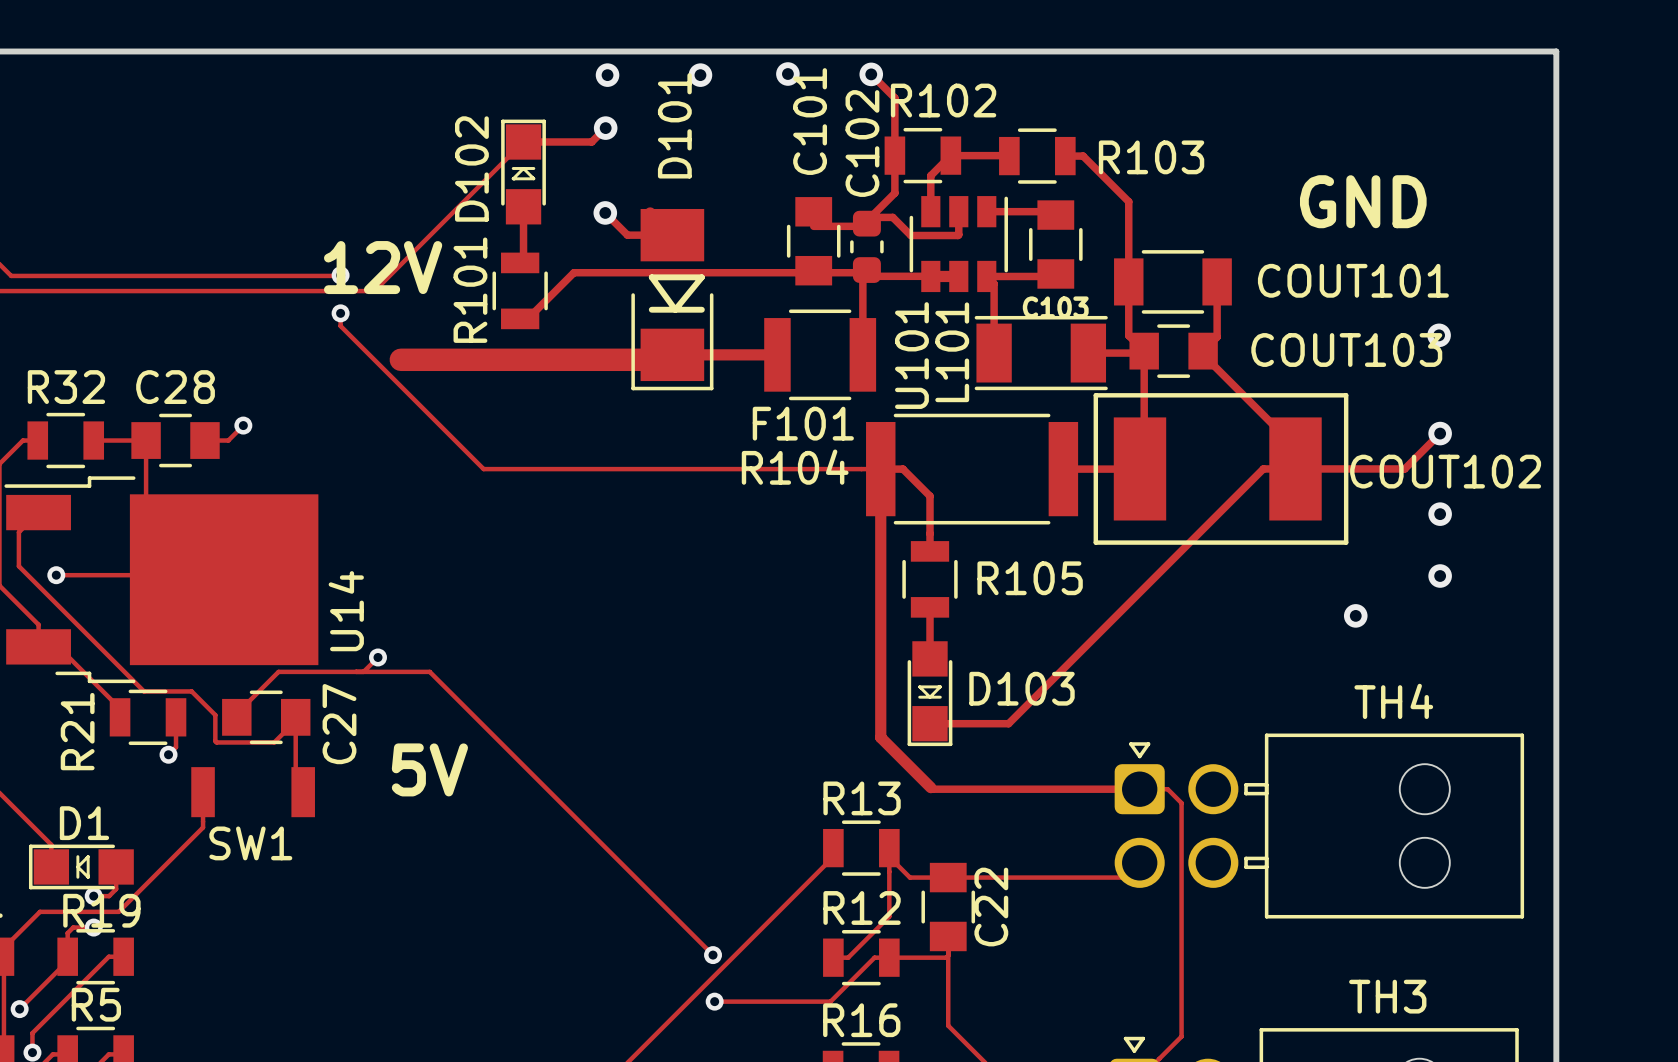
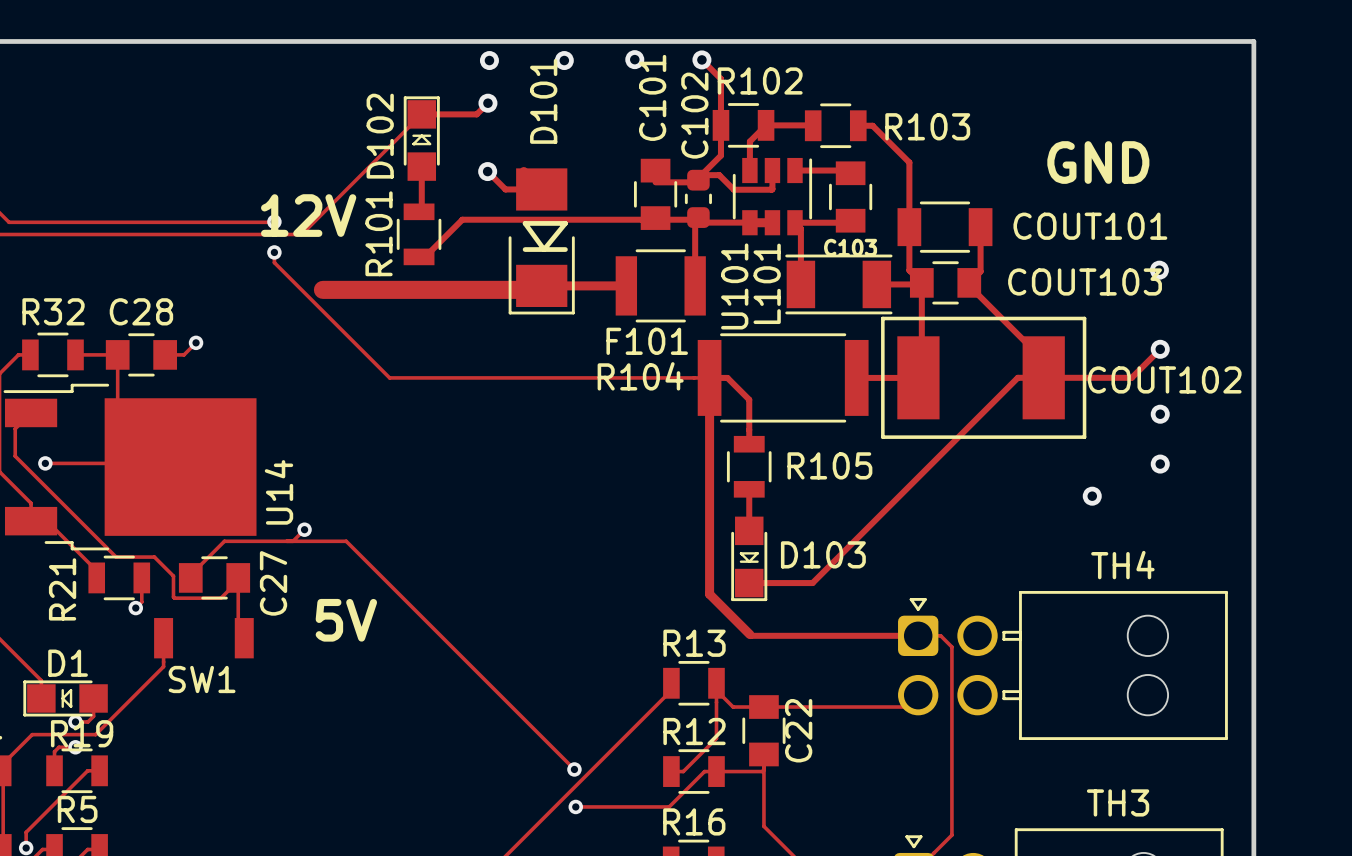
track: (67, 956) (67, 961) (19, 1009) -> none
via: (19, 1009) -> none

